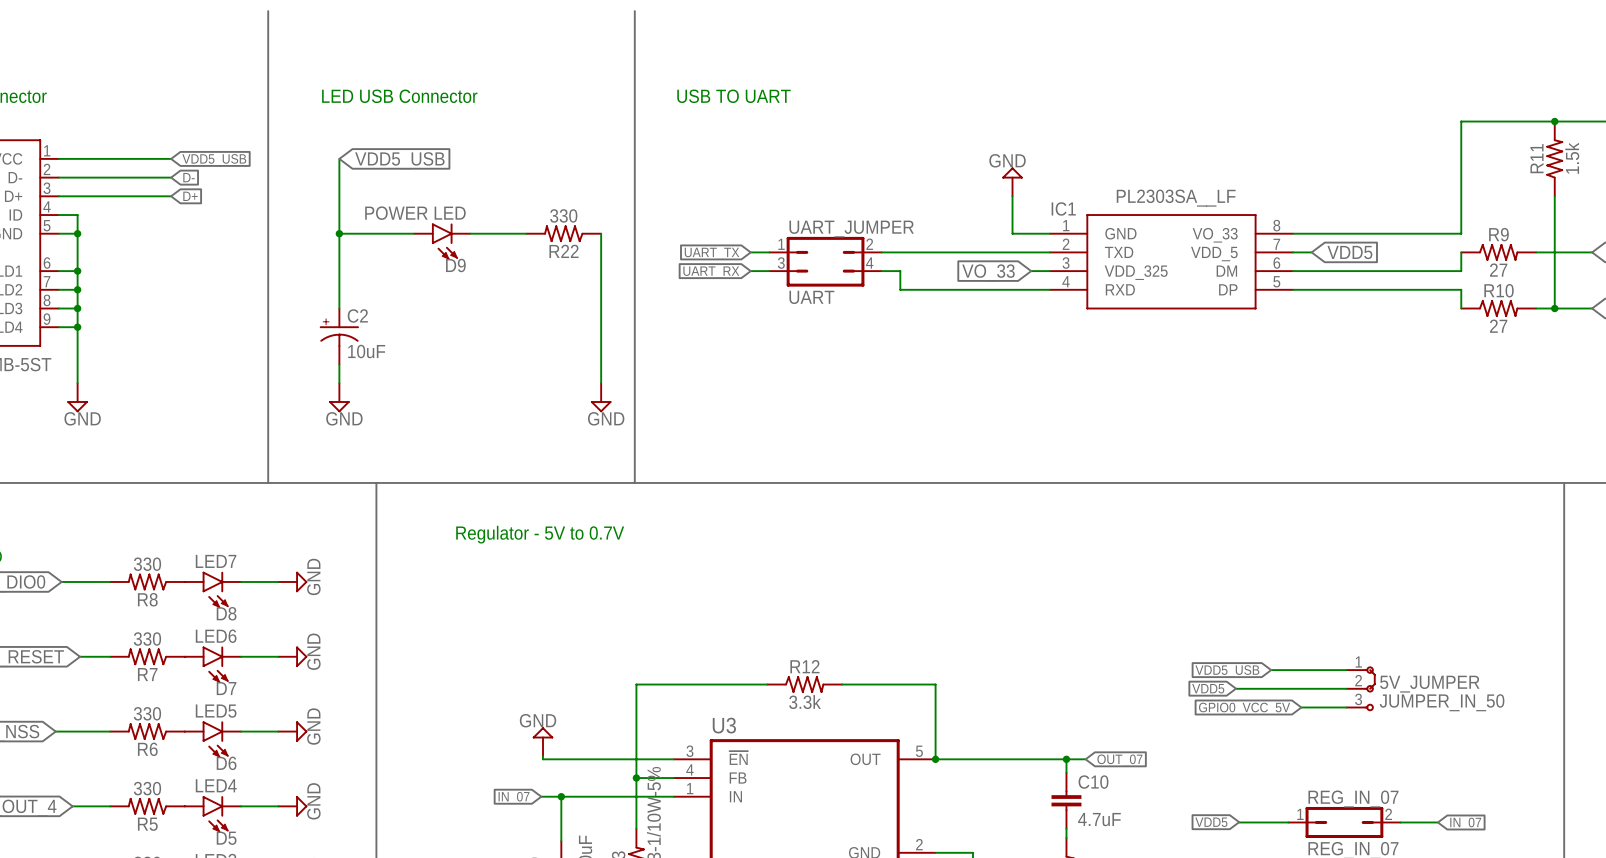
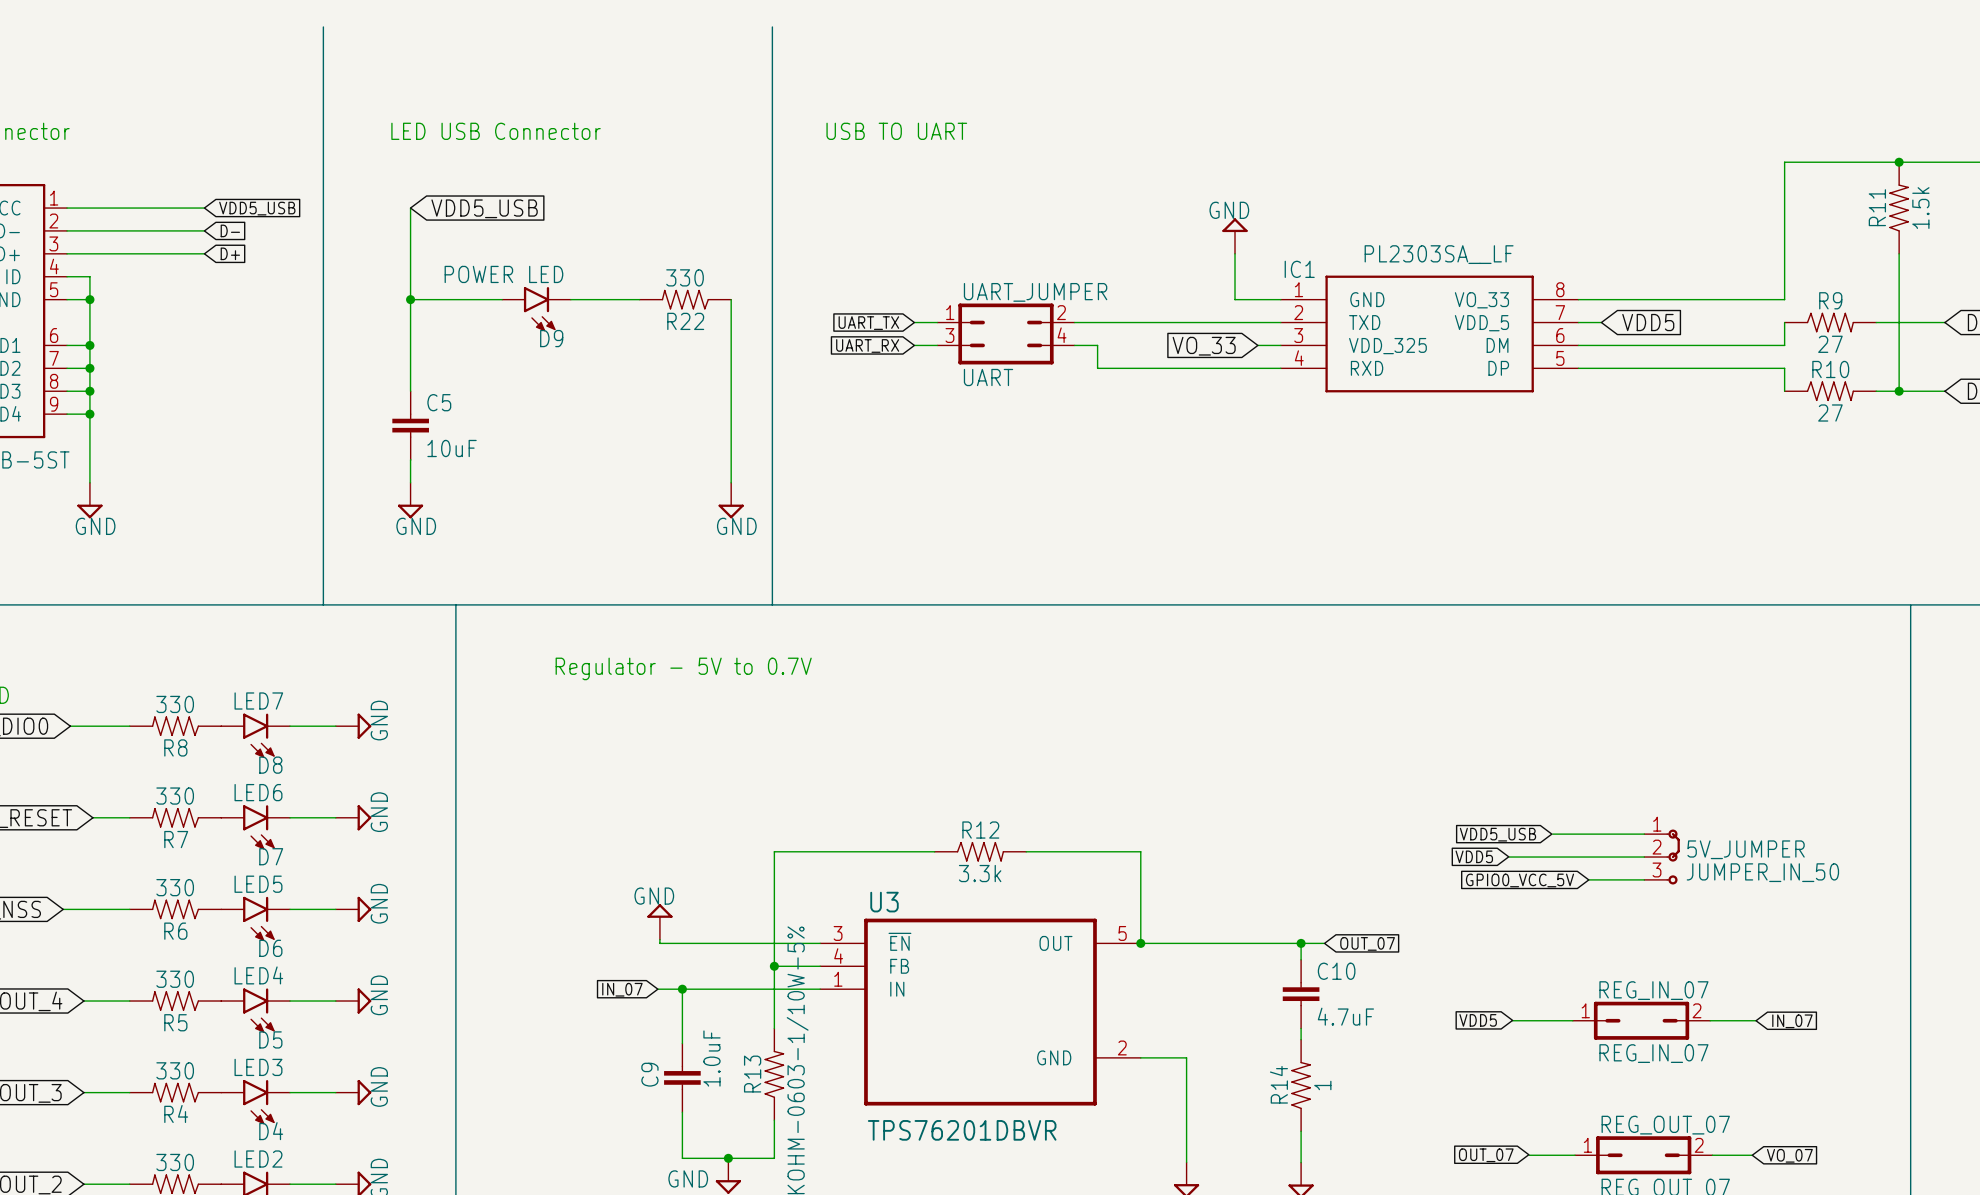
C2: 10uF (339, 336) -> none
C5: none -> 10uF (410, 425)

